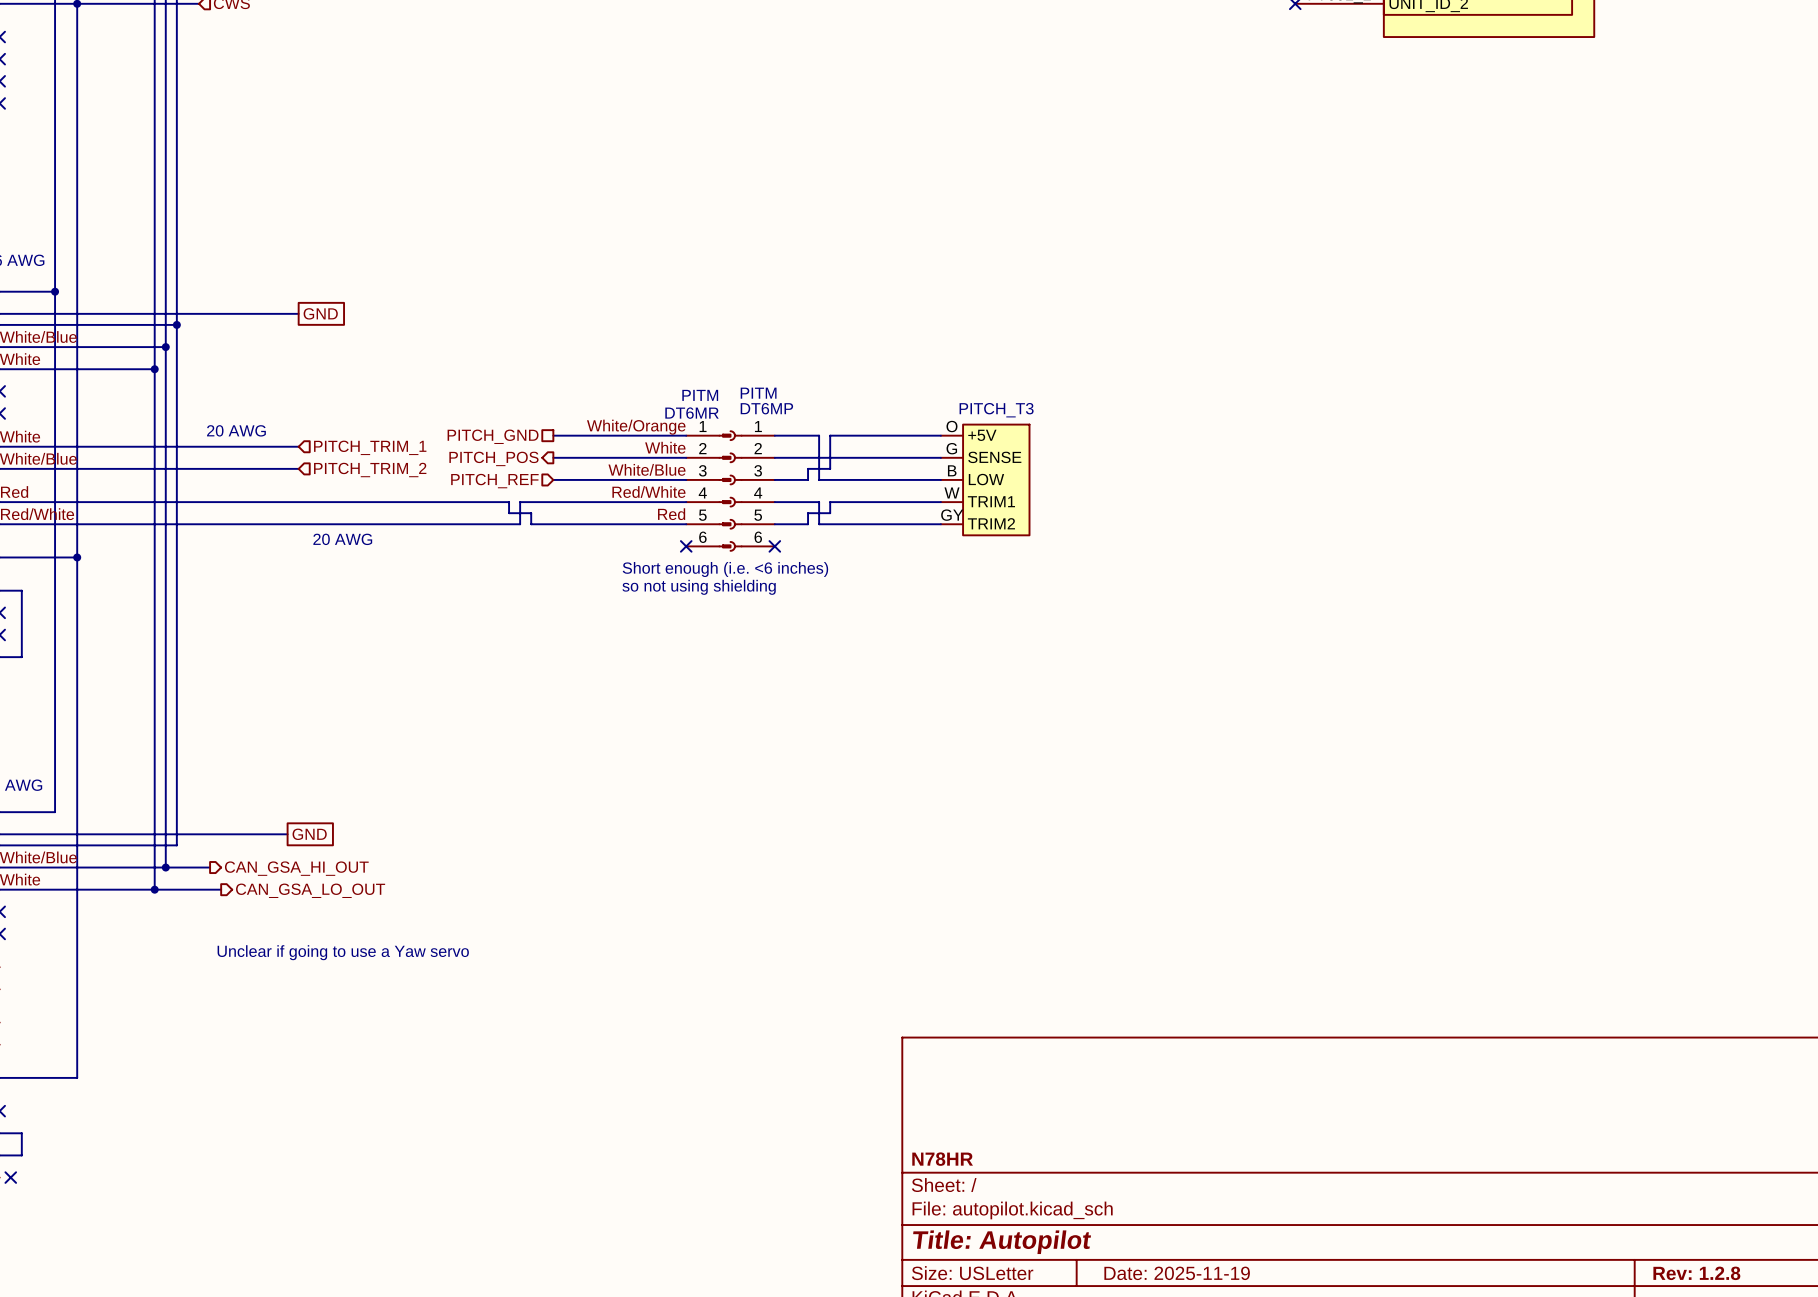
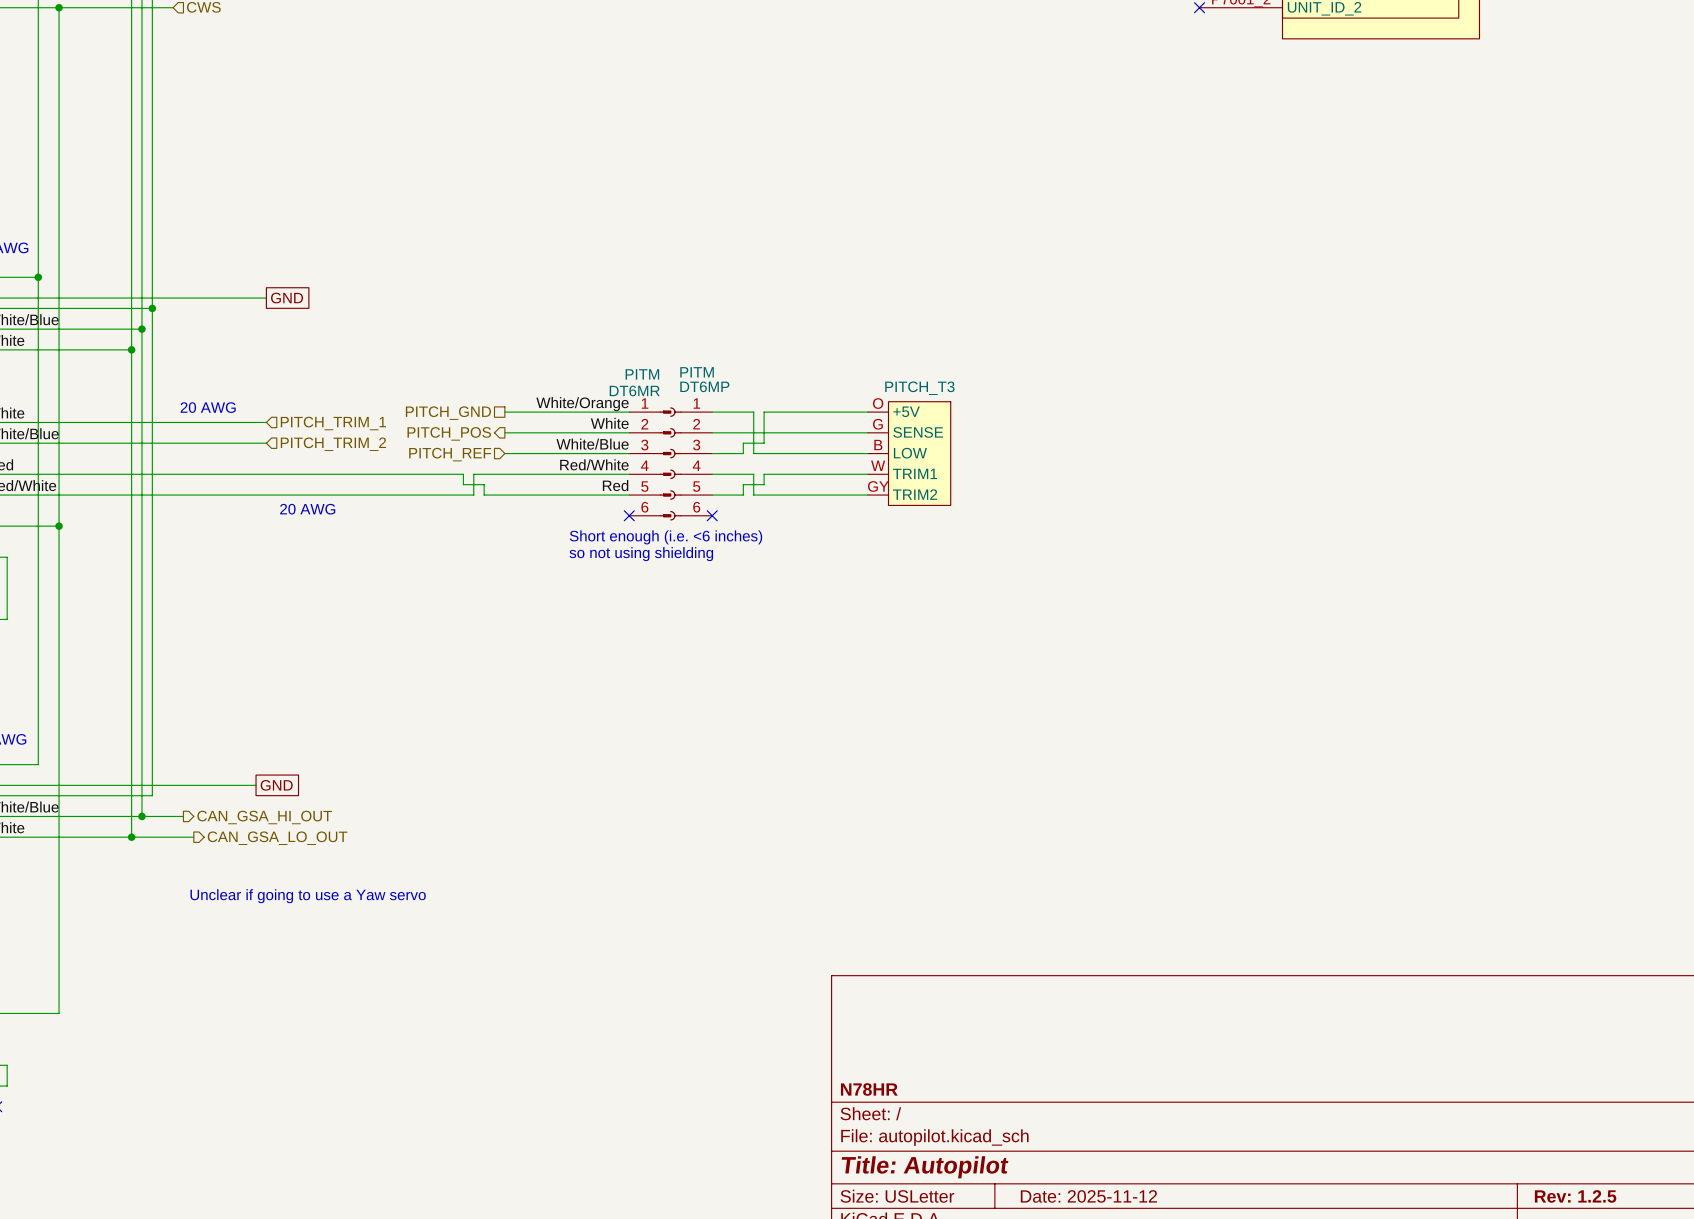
title block: Date: 2025-11-19 (1177, 1273) -> Date: 2025-11-12 (1088, 1196)
title block: Rev: 1.2.8 (1696, 1273) -> Rev: 1.2.5 (1575, 1196)

